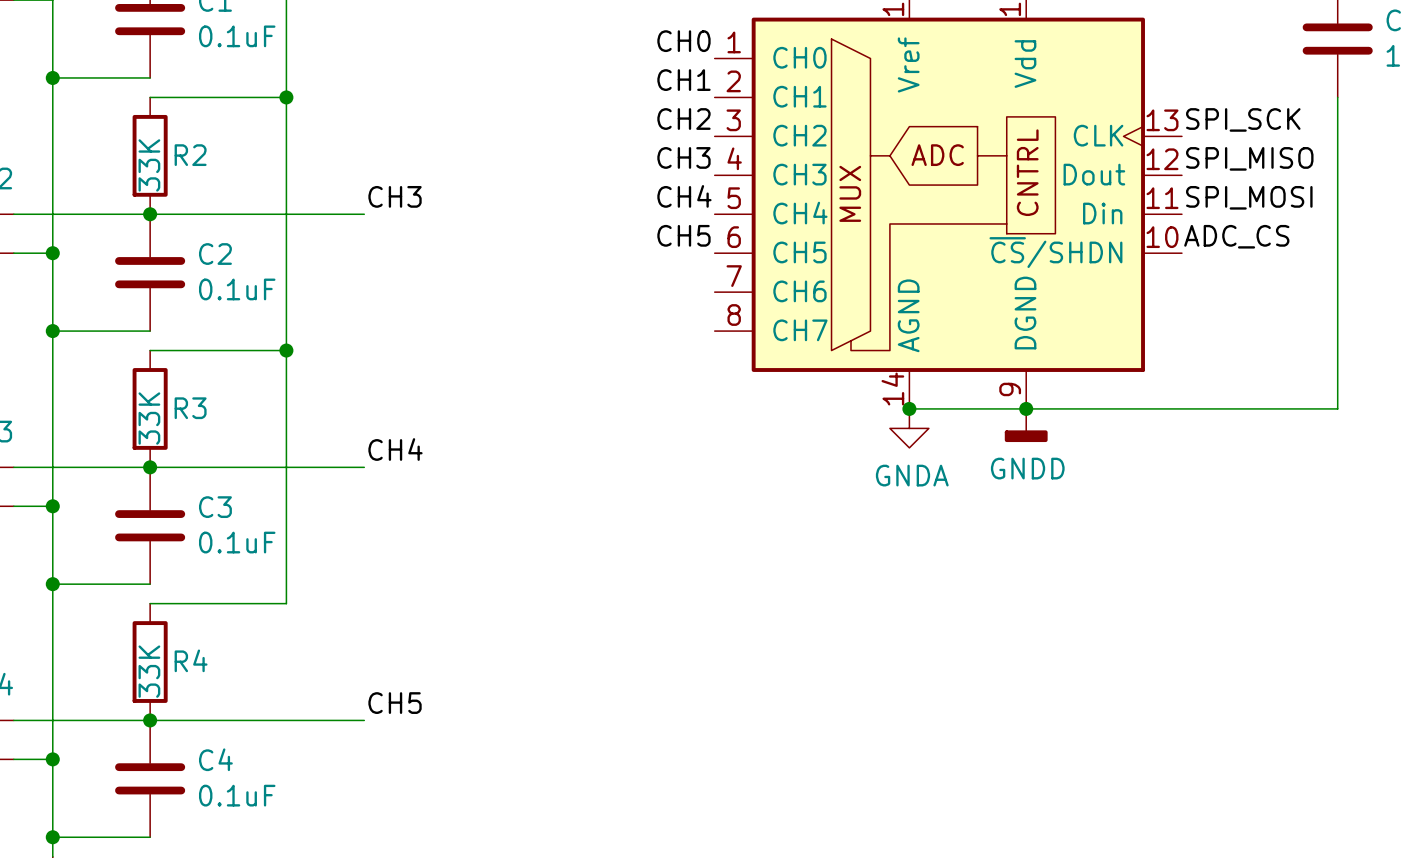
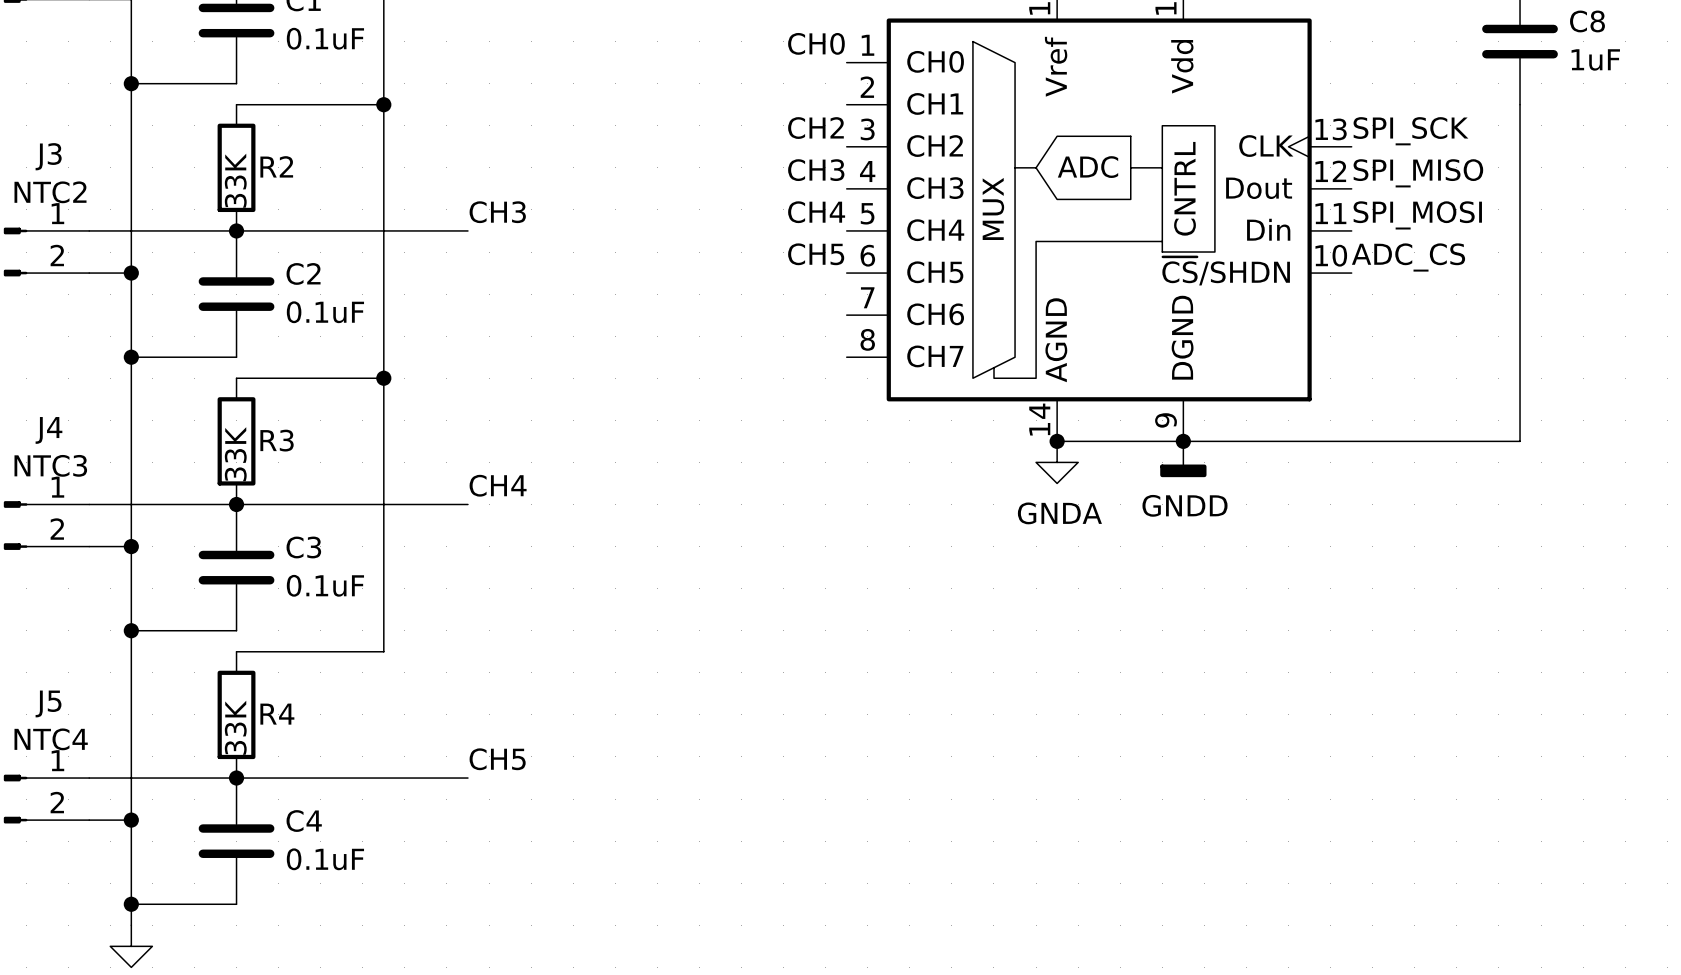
label: CH1 (683, 80) -> none

